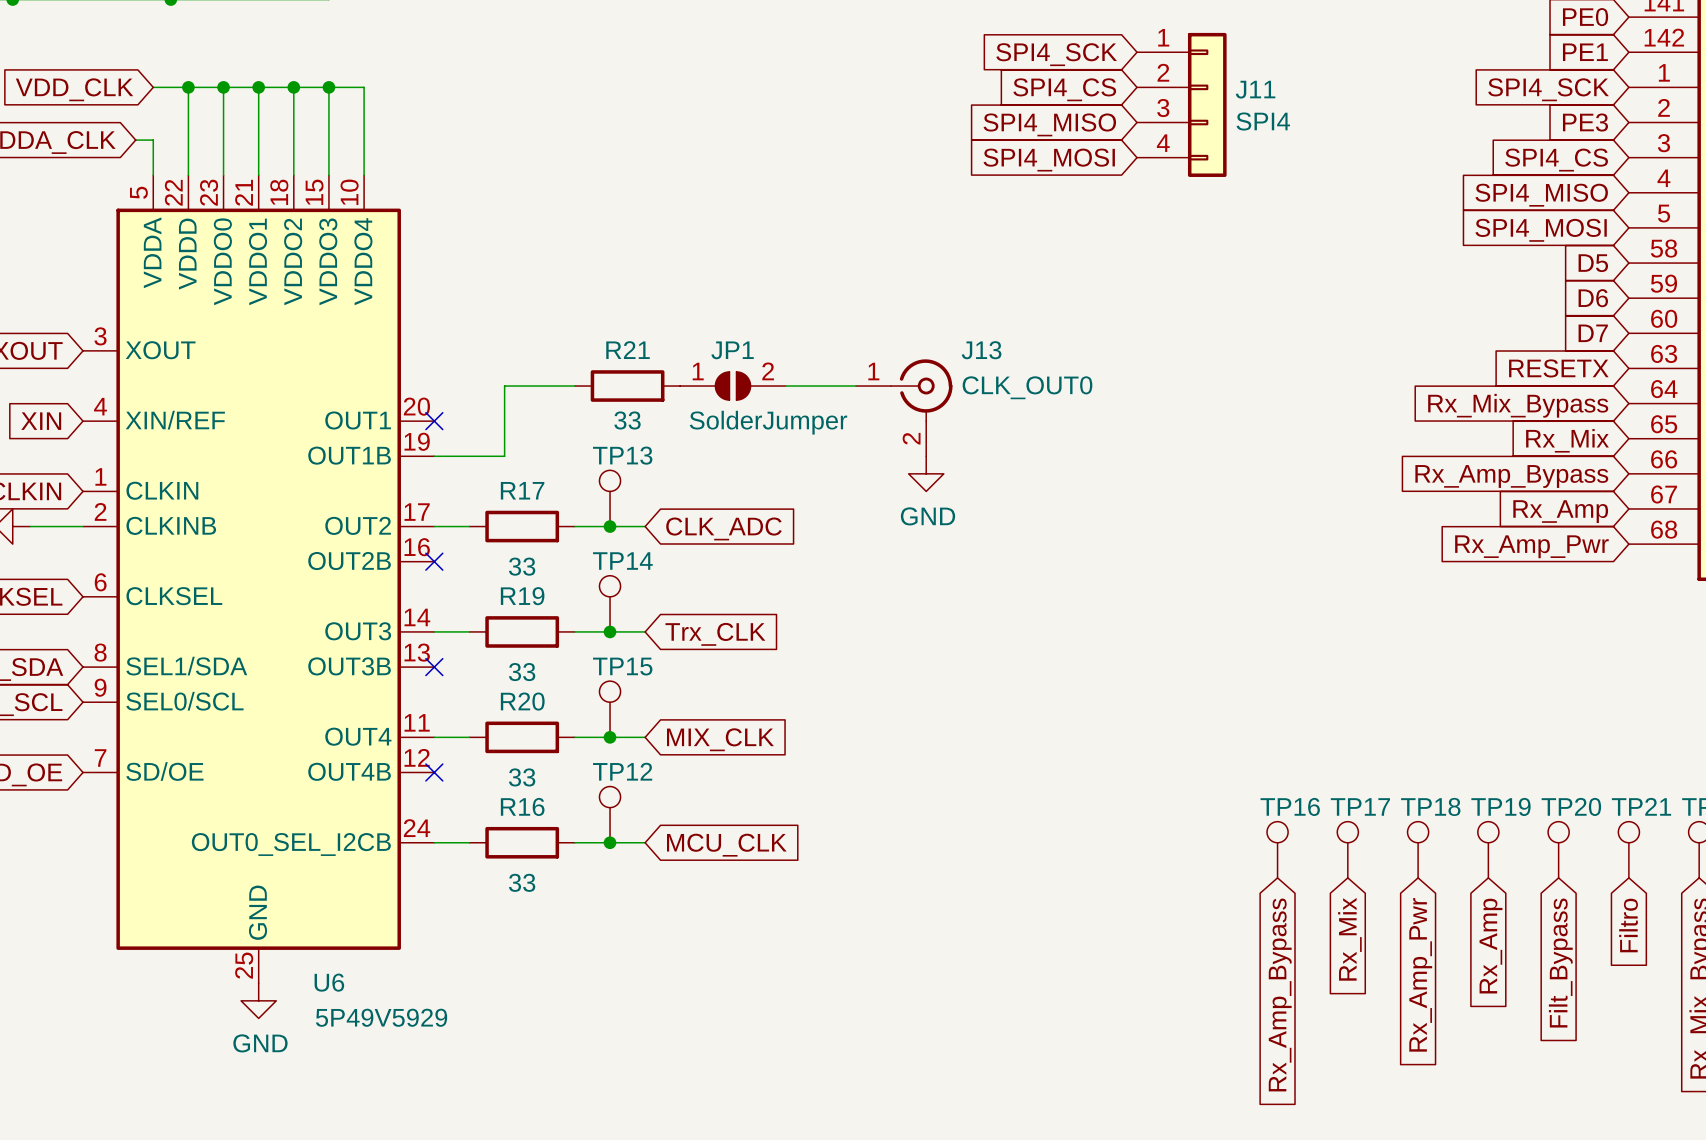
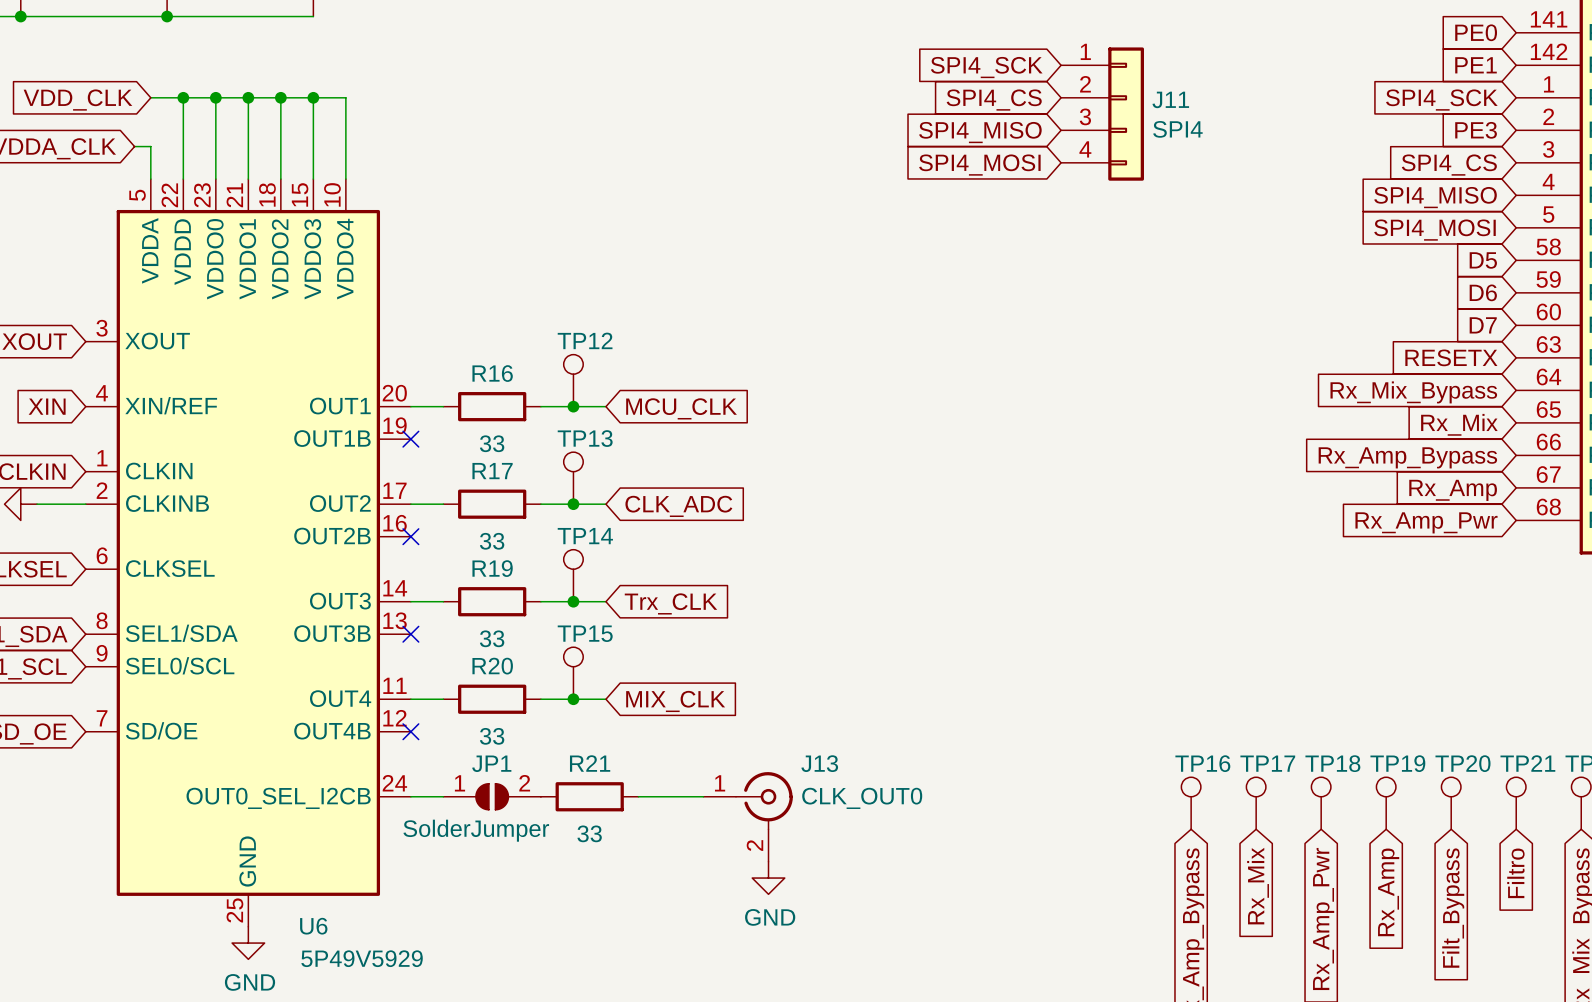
wire: (574, 386) (504, 386) (504, 456) (434, 456) -> none
R21 position: (627, 386) -> (589, 796)
JP1 position: (732, 386) -> (492, 796)
wire: (785, 386) (855, 386) -> (540, 406) (605, 406)
J13 position: (904, 407) -> (748, 816)
R21 value position: 33 (627, 420) -> 33 (589, 833)
wire: none -> (410, 406) (443, 406)
no-connect mark position: (434, 421) -> (410, 439)
junction: none -> (573, 406)
JP1 value position: SolderJumper (768, 422) -> SolderJumper (476, 830)
global label: none -> MCU_CLK (681, 408)
power symbol: GND (926, 473) -> none
TP12 position: (610, 814) -> (573, 380)
R16 position: (522, 842) -> (492, 406)
wire: (574, 842) (645, 842) -> (638, 796) (703, 796)
junction: (610, 842) -> none
global label: MCU_CLK (726, 845) -> none
power symbol: none -> GND (768, 878)

